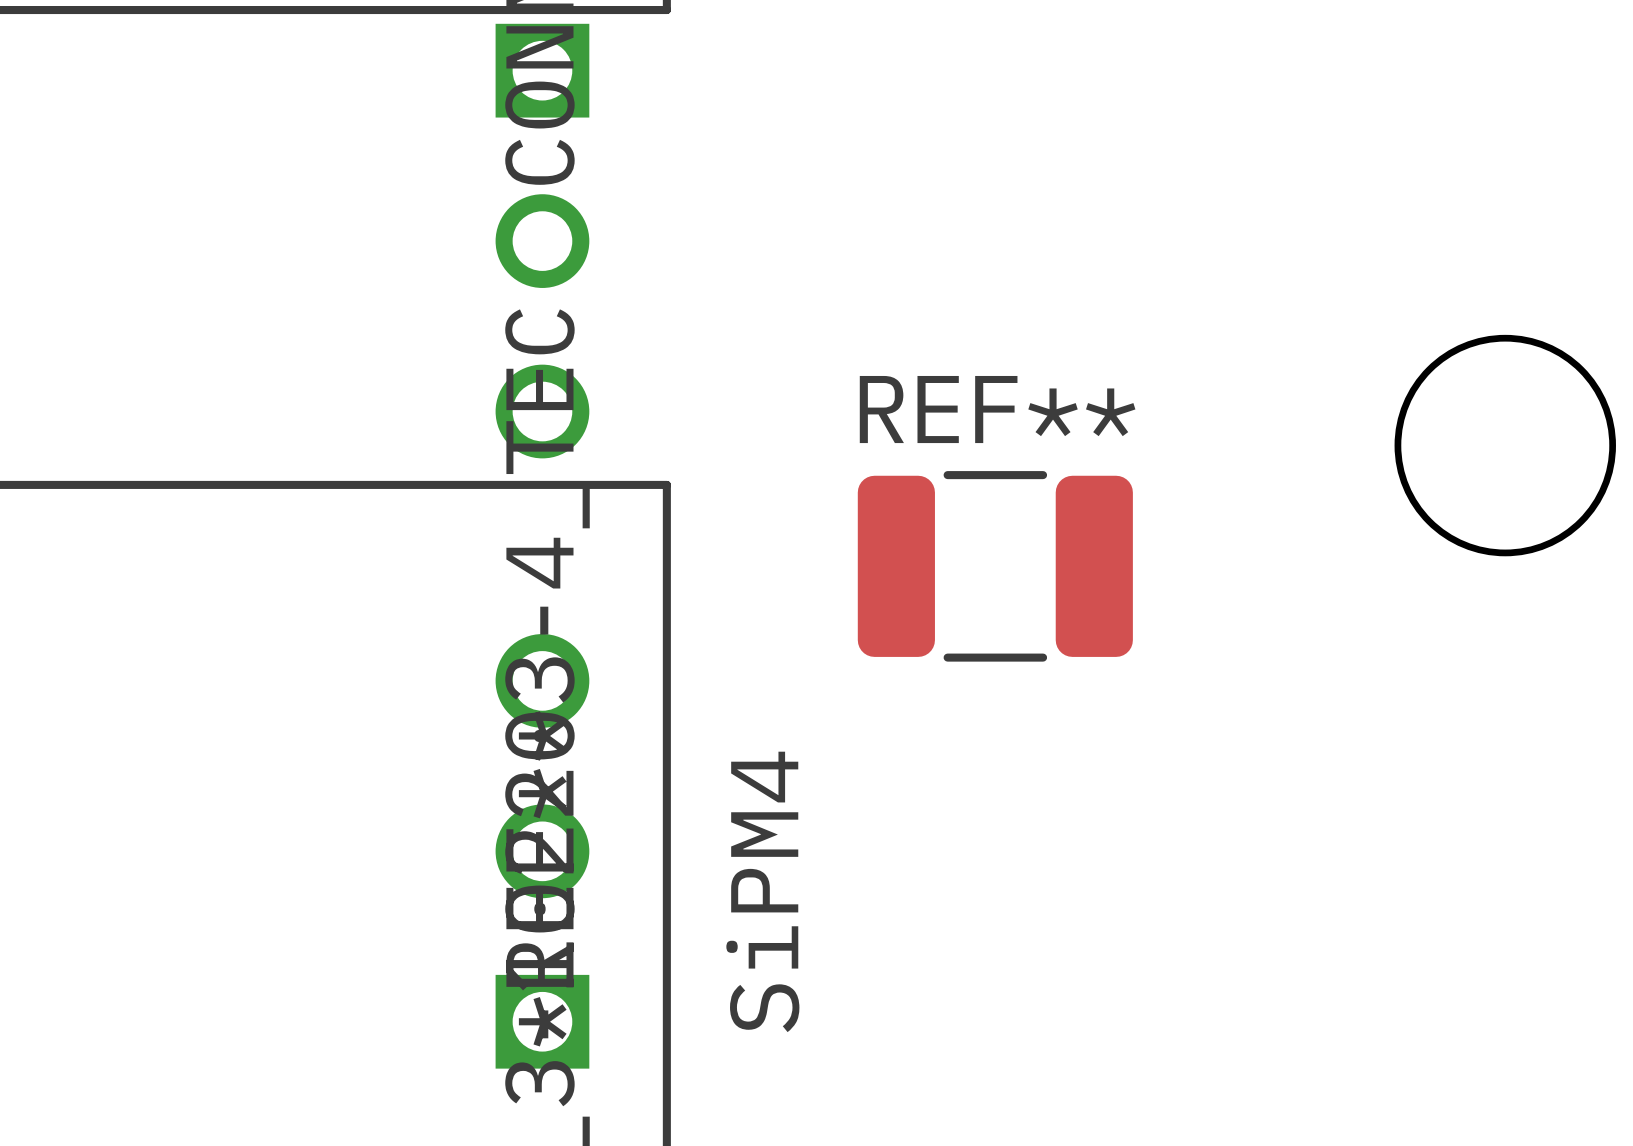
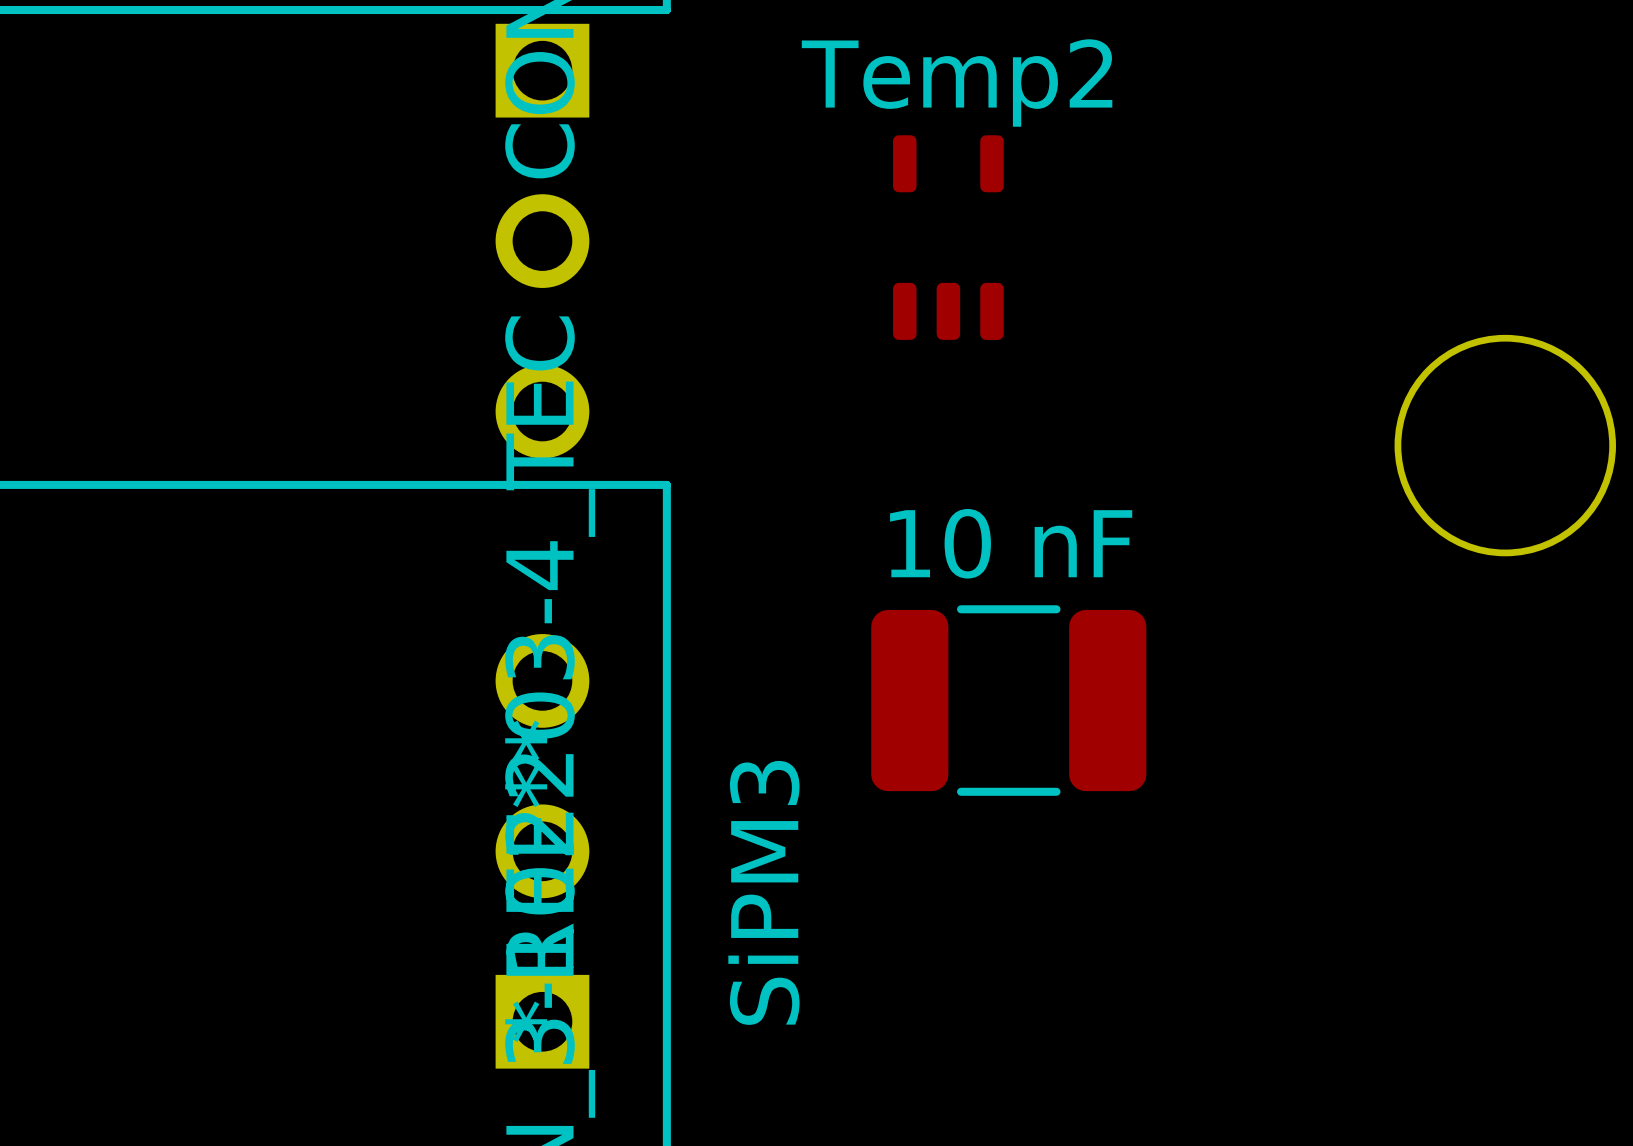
Temp2: none -> (948, 237)
REF**: (995, 566) -> none
10 nF: none -> (1008, 700)
text: SiPM4 (762, 891) -> SiPM3 (763, 892)

